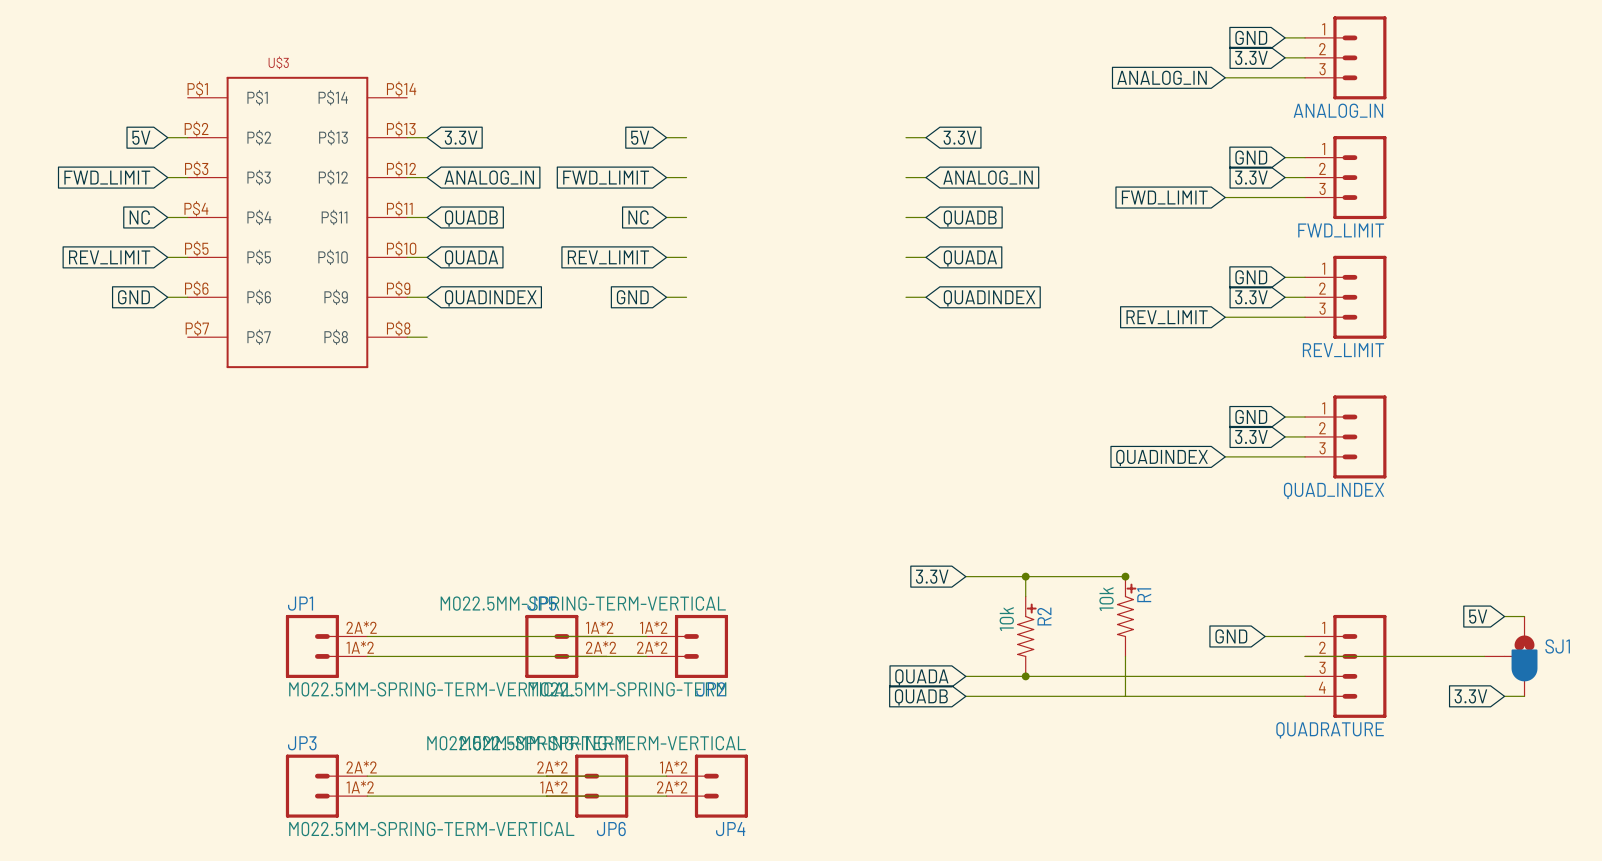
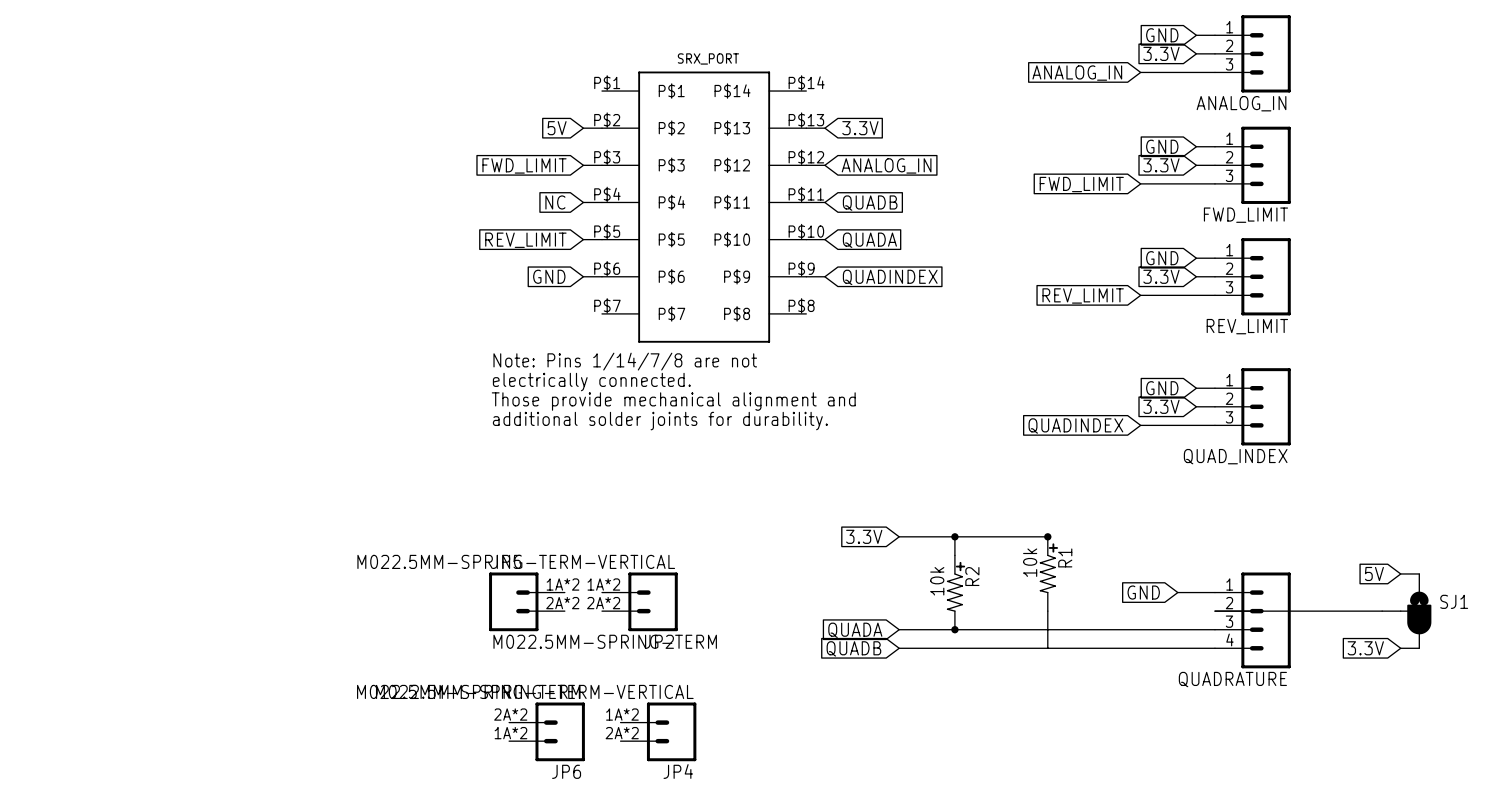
global label: 5V (141, 137) -> none
wire: (167, 137) (187, 137) -> none
wire: (407, 137) (427, 137) -> none
global label: 3.3V (461, 137) -> none
global label position: 5V (640, 137) -> 5V (557, 128)
wire: (905, 137) (925, 137) -> (806, 128) (824, 128)
global label position: 3.3V (959, 137) -> 3.3V (860, 128)
global label: FWD_LIMIT (107, 177) -> none
wire: (167, 177) (187, 177) -> none
wire: (407, 177) (427, 177) -> none
global label: ANALOG_IN (489, 177) -> none
global label position: FWD_LIMIT (606, 177) -> FWD_LIMIT (524, 165)
wire: (905, 177) (925, 177) -> (806, 165) (824, 165)
global label position: ANALOG_IN (988, 177) -> ANALOG_IN (886, 165)
global label: NC (139, 217) -> none
wire: (167, 217) (187, 217) -> none
wire: (407, 217) (427, 217) -> none
global label position: NC (638, 217) -> NC (555, 202)
wire: (905, 217) (925, 217) -> (806, 202) (824, 202)
global label: QUADB (471, 218) -> none
global label position: QUADB (970, 218) -> QUADB (870, 203)
U$3: (297, 222) -> none
SRX_PORT: none -> (704, 207)
global label: REV_LIMIT (109, 257) -> none
wire: (167, 257) (187, 257) -> none
wire: (407, 257) (427, 257) -> none
global label position: REV_LIMIT (608, 257) -> REV_LIMIT (525, 240)
wire: (905, 257) (925, 257) -> (806, 239) (824, 239)
global label: QUADA (471, 258) -> none
global label position: QUADA (970, 258) -> QUADA (869, 240)
global label: GND (133, 297) -> none
wire: (167, 297) (187, 297) -> none
wire: (407, 297) (427, 297) -> none
global label position: GND (632, 297) -> GND (549, 276)
wire: (905, 297) (925, 297) -> (806, 276) (824, 276)
global label: QUADINDEX (490, 298) -> none
global label position: QUADINDEX (989, 298) -> QUADINDEX (890, 277)
wire: (407, 337) (427, 337) -> none
text: none -> Note: Pins 1/14/7/8 are not (625, 361)
text: none -> electrically connected. (591, 382)
text: none -> Those provide mechanical alignment and (673, 401)
text: none -> additional solder joints for durability. (660, 421)
wire: (367, 636) (646, 636) -> none
JP1: M022.5MM-SPRING-TERM-VERTICAL (326, 646) -> none
wire: (367, 656) (646, 656) -> none
wire: (367, 776) (666, 776) -> none
JP3: M022.5MM-SPRING-TERM-VERTICAL (326, 786) -> none
wire: (367, 796) (666, 796) -> none

